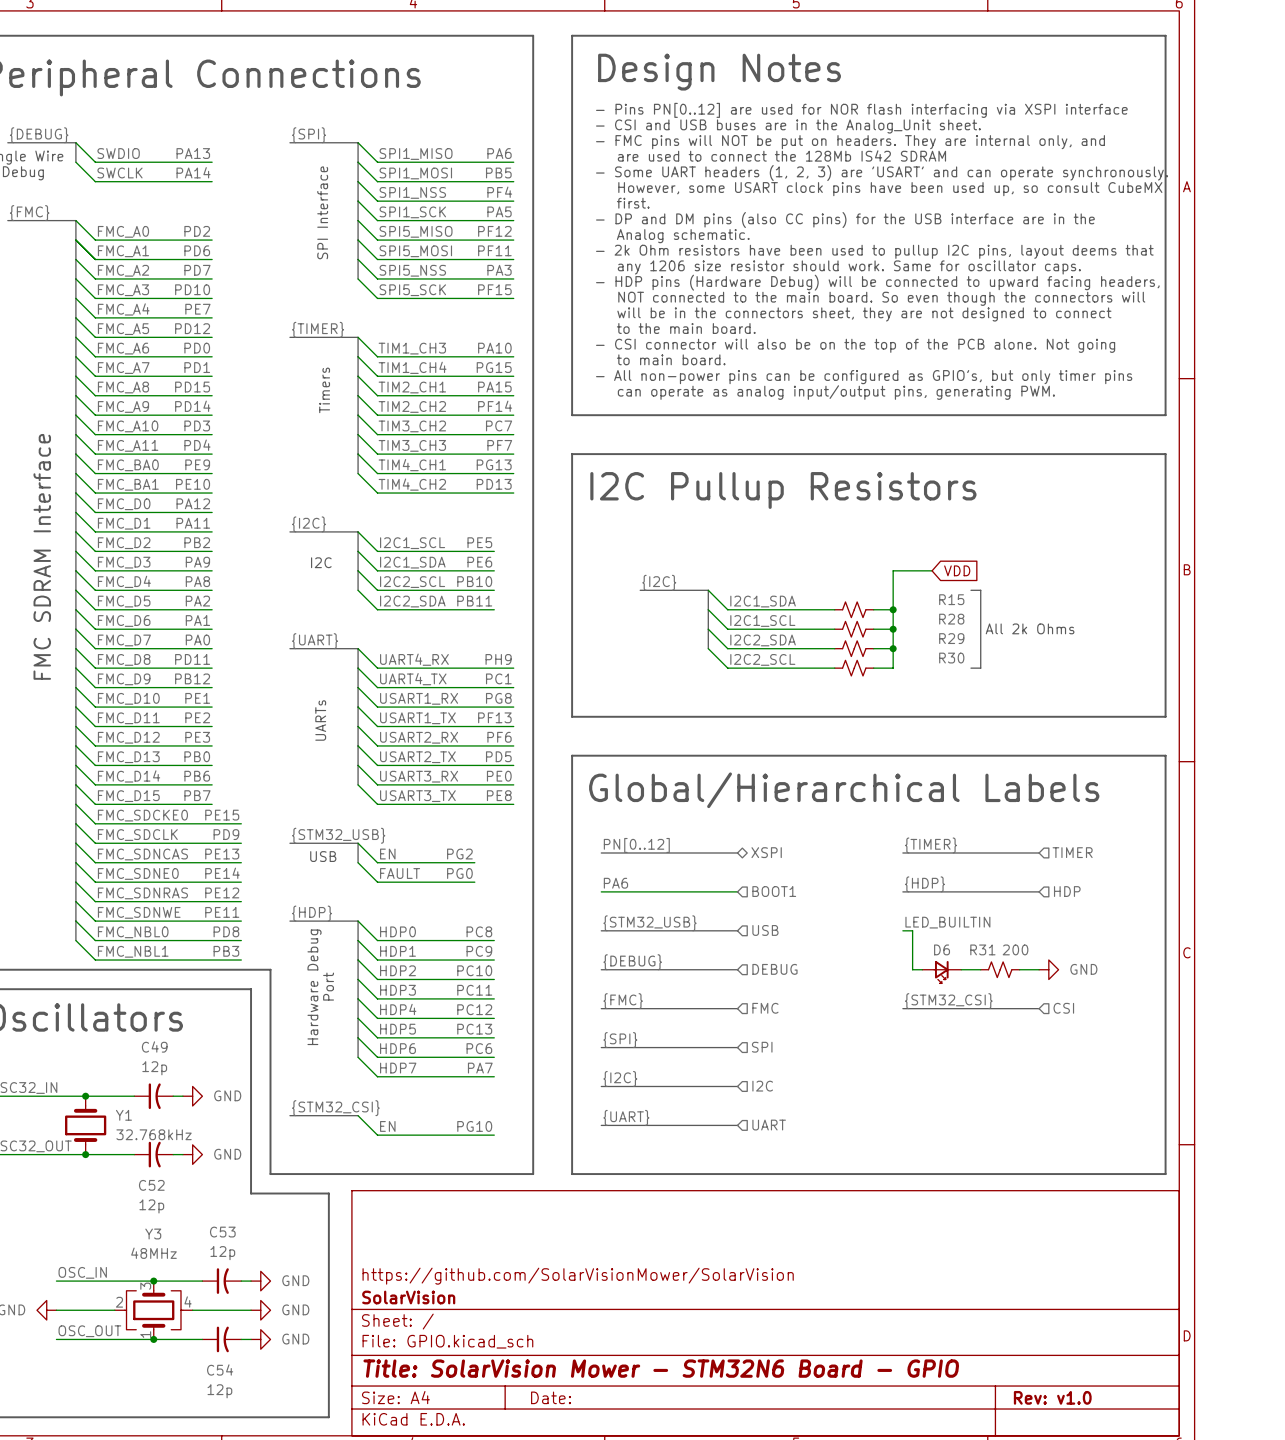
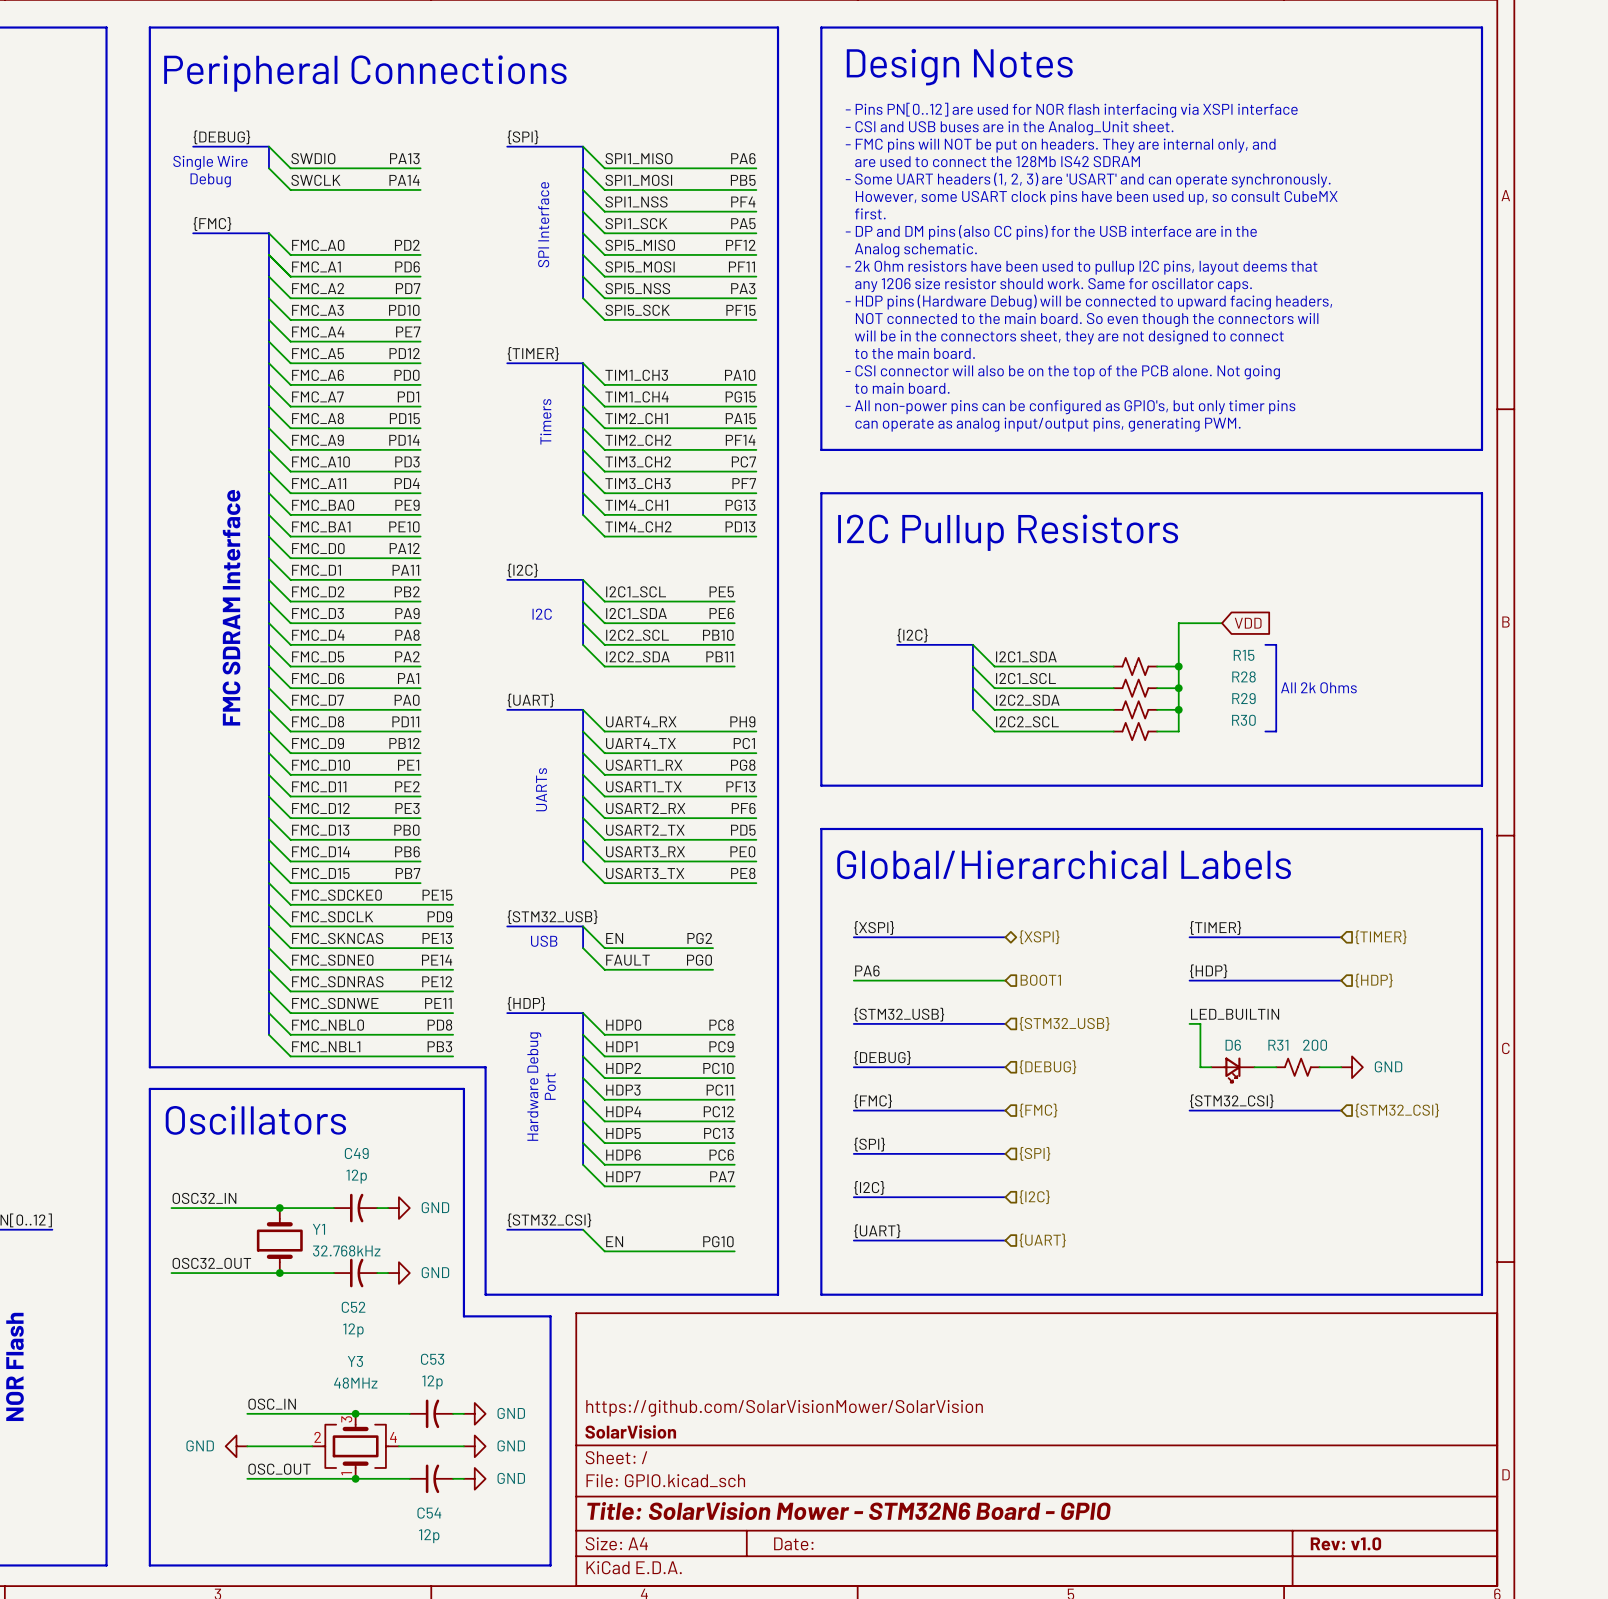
label: PN[0..12] (636, 845) -> {XSPI} (874, 927)
hierarchical label: XSPI (766, 852) -> {XSPI} (1039, 937)
hierarchical label: TIMER (1072, 852) -> {TIMER} (1380, 937)
label: FMC_SDNCAS (142, 854) -> FMC_SKNCAS (337, 938)
hierarchical label: HDP (1067, 891) -> {HDP} (1374, 980)
hierarchical label: USB (765, 930) -> {STM32_USB} (1064, 1023)
hierarchical label: DEBUG (774, 969) -> {DEBUG} (1047, 1067)
hierarchical label: FMC (765, 1008) -> {FMC} (1038, 1110)
hierarchical label: CSI (1063, 1008) -> {STM32_CSI} (1397, 1110)
hierarchical label: SPI (762, 1047) -> {SPI} (1034, 1153)
hierarchical label: I2C (762, 1086) -> {I2C} (1034, 1197)
hierarchical label: UART (769, 1125) -> {UART} (1042, 1240)

